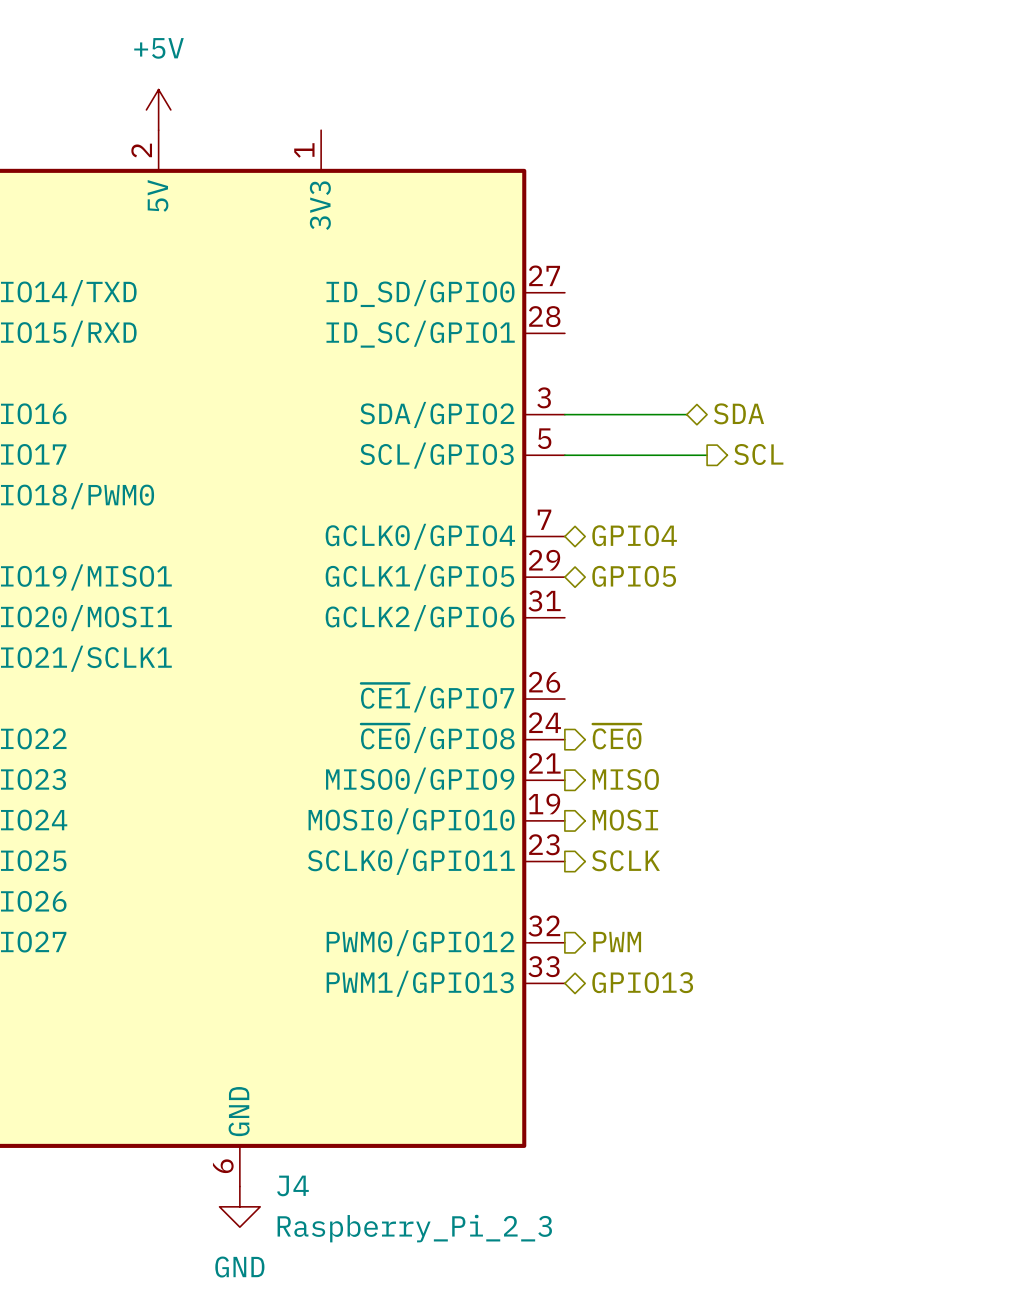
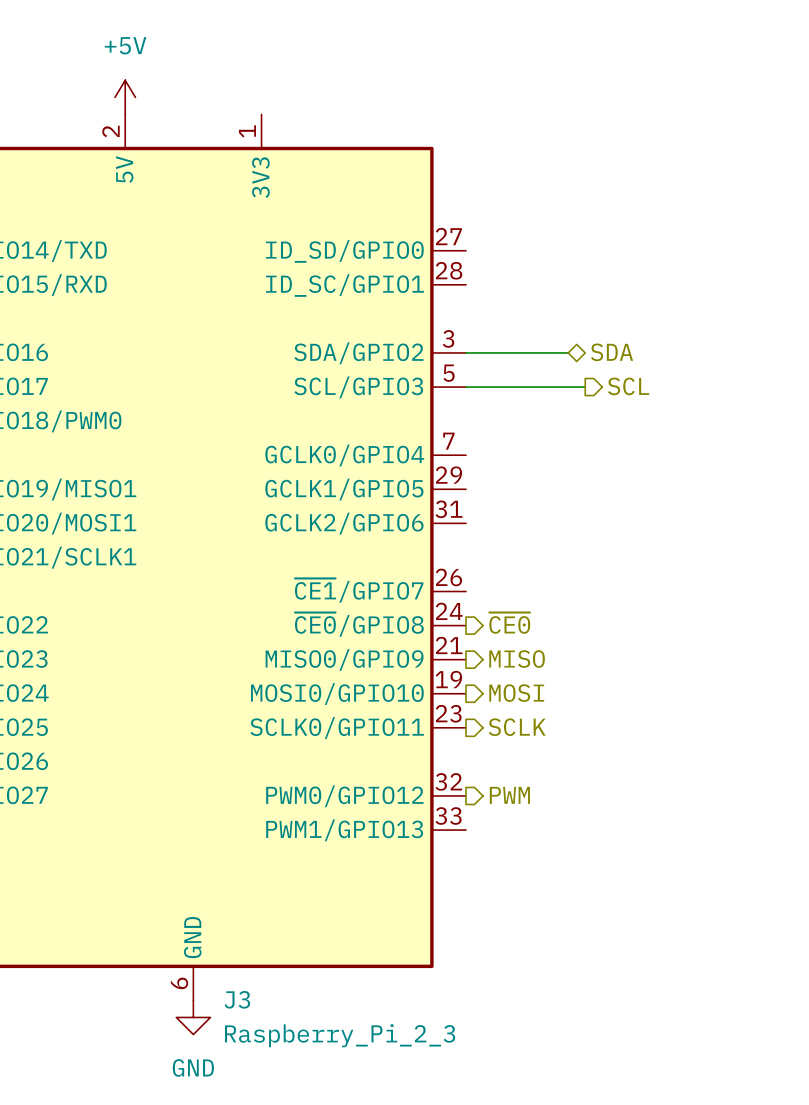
hierarchical label: GPIO4 (634, 535) -> none
hierarchical label: GPIO5 (634, 576) -> none
hierarchical label: GPIO13 (642, 982) -> none
J4 name: J4 (292, 1185) -> J3 (237, 999)

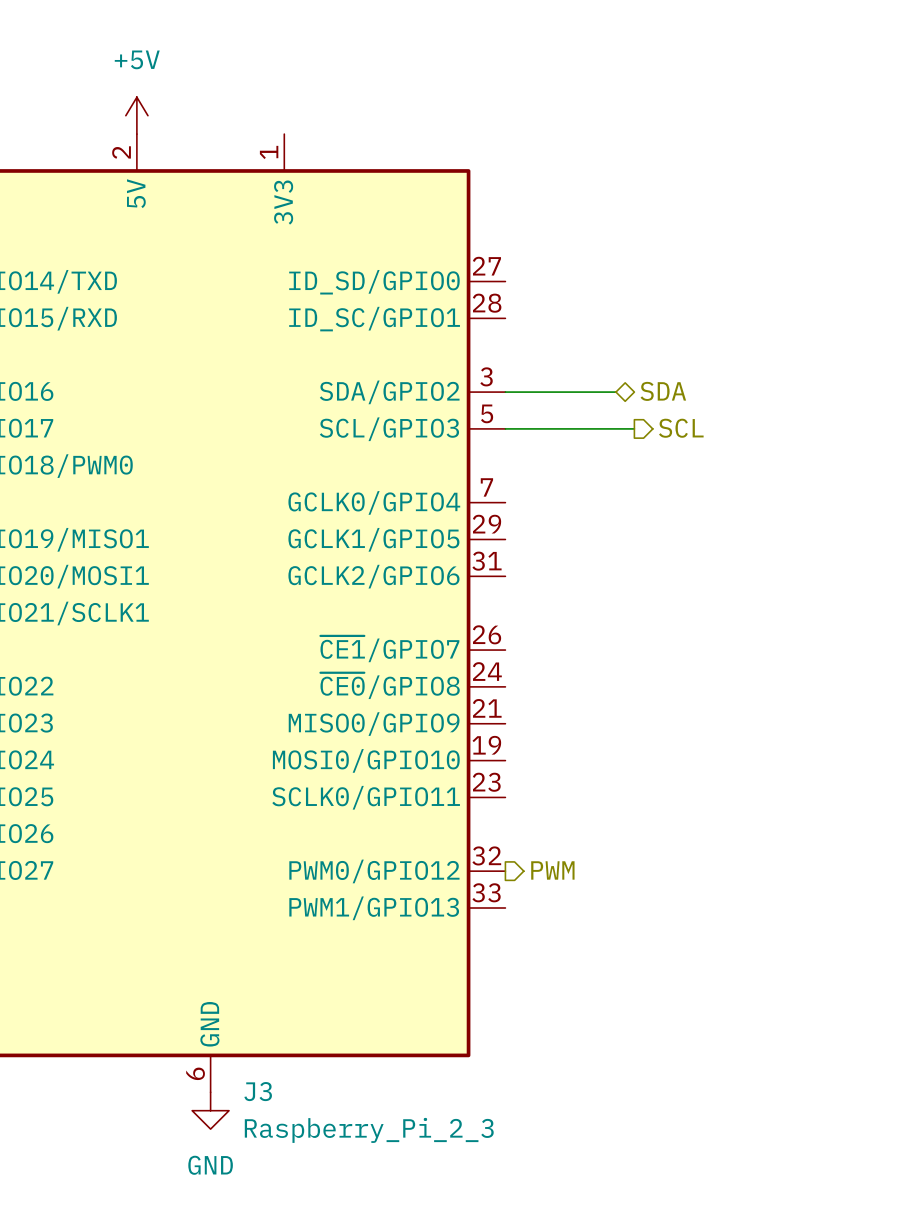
hierarchical label: ~{CE0} (509, 623) -> none
hierarchical label: MISO (517, 659) -> none
hierarchical label: MOSI (516, 693) -> none
hierarchical label: SCLK (517, 727) -> none

